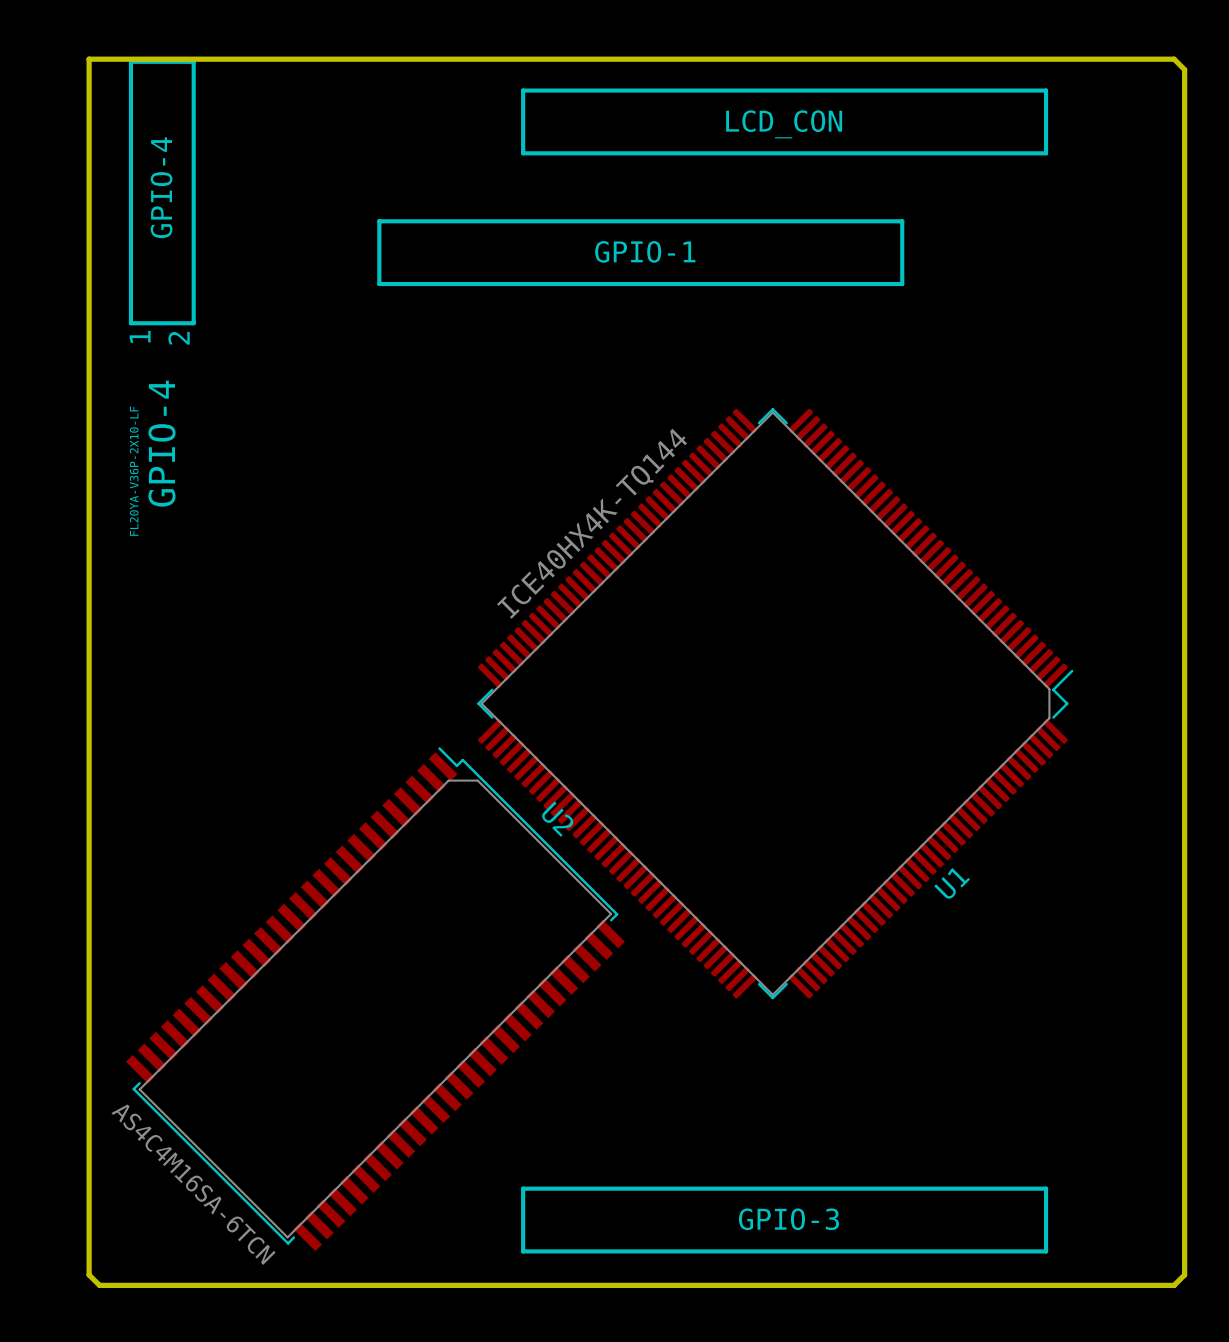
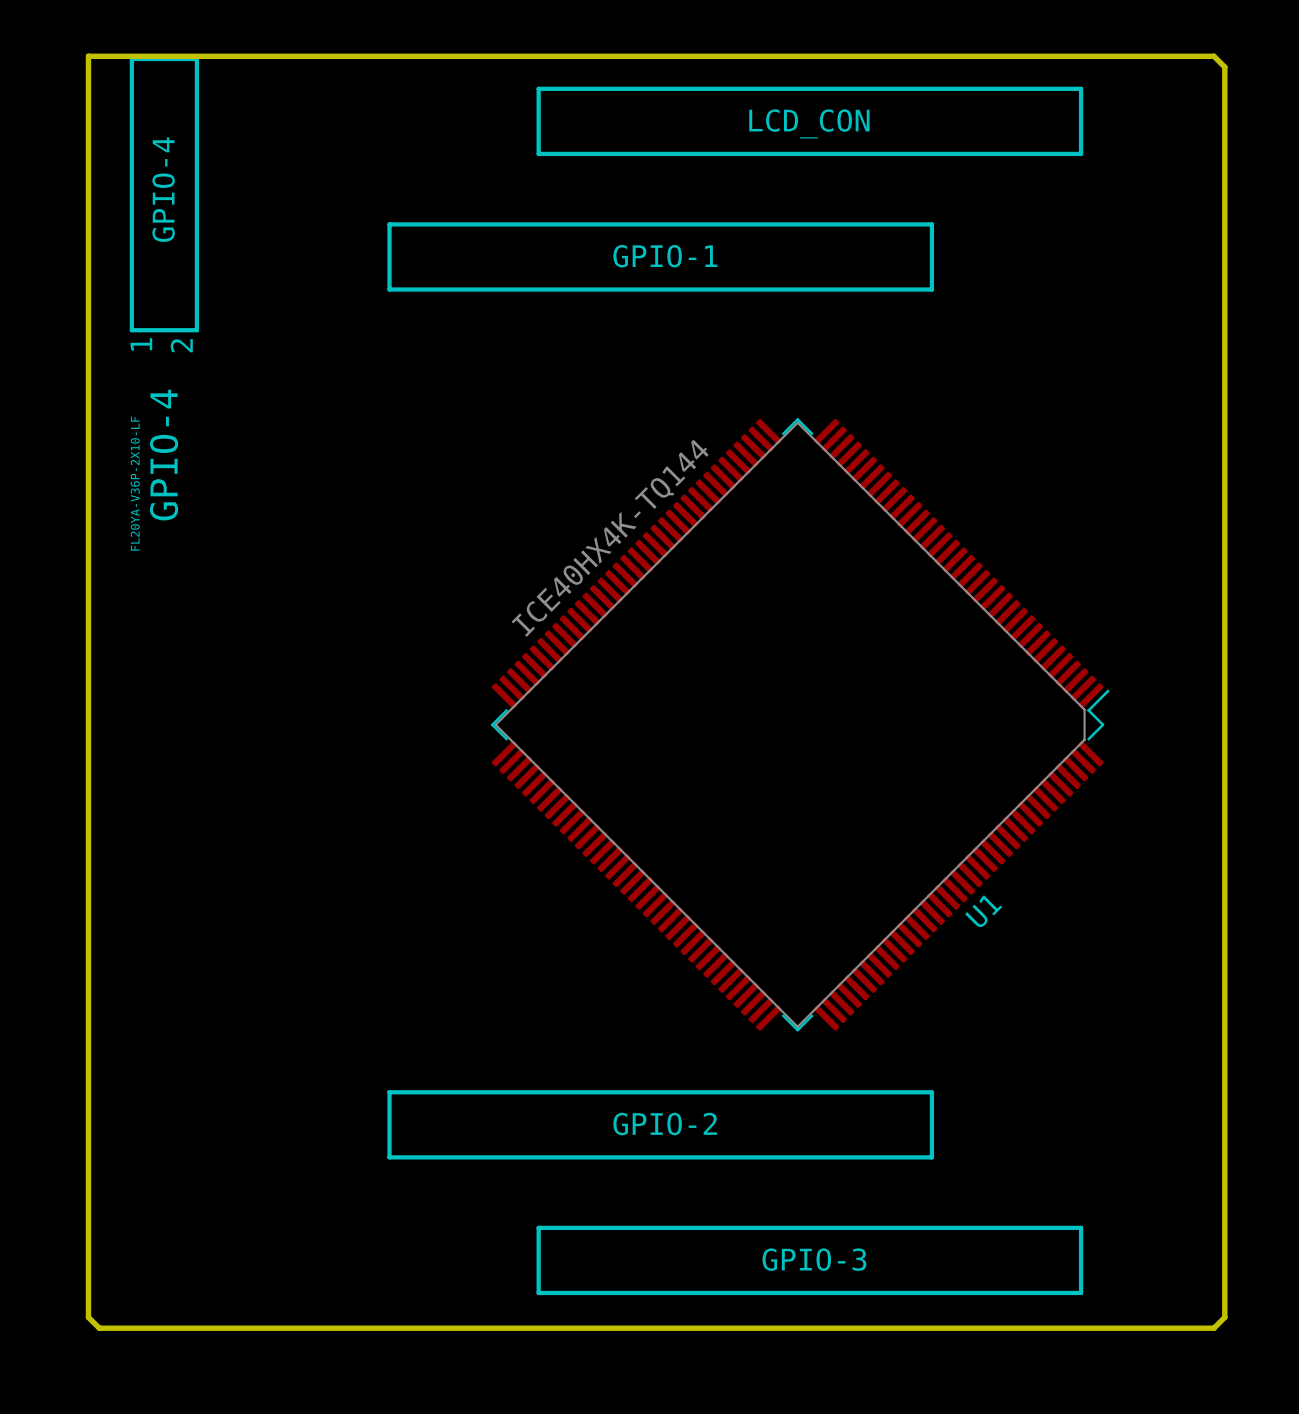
U2: AS4C4M16SA-6TCN (375, 999) -> none
line: none -> (389, 1092) (931, 1092) (931, 1157) (389, 1157) (389, 1092)
text: none -> GPIO-2 (665, 1124)

